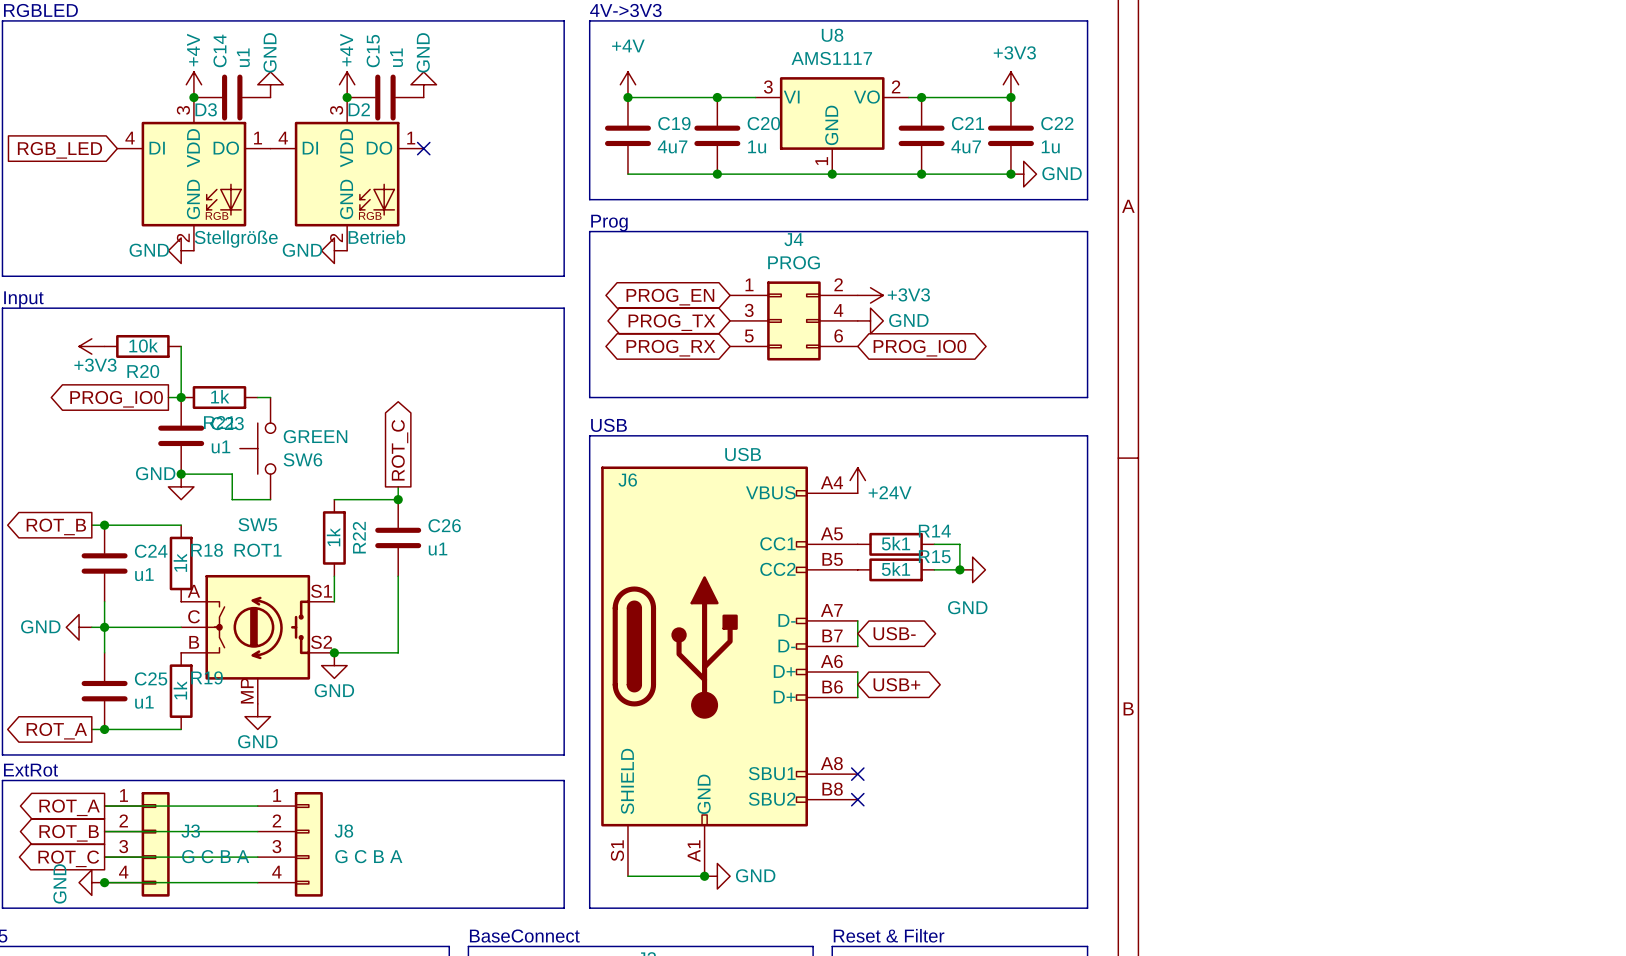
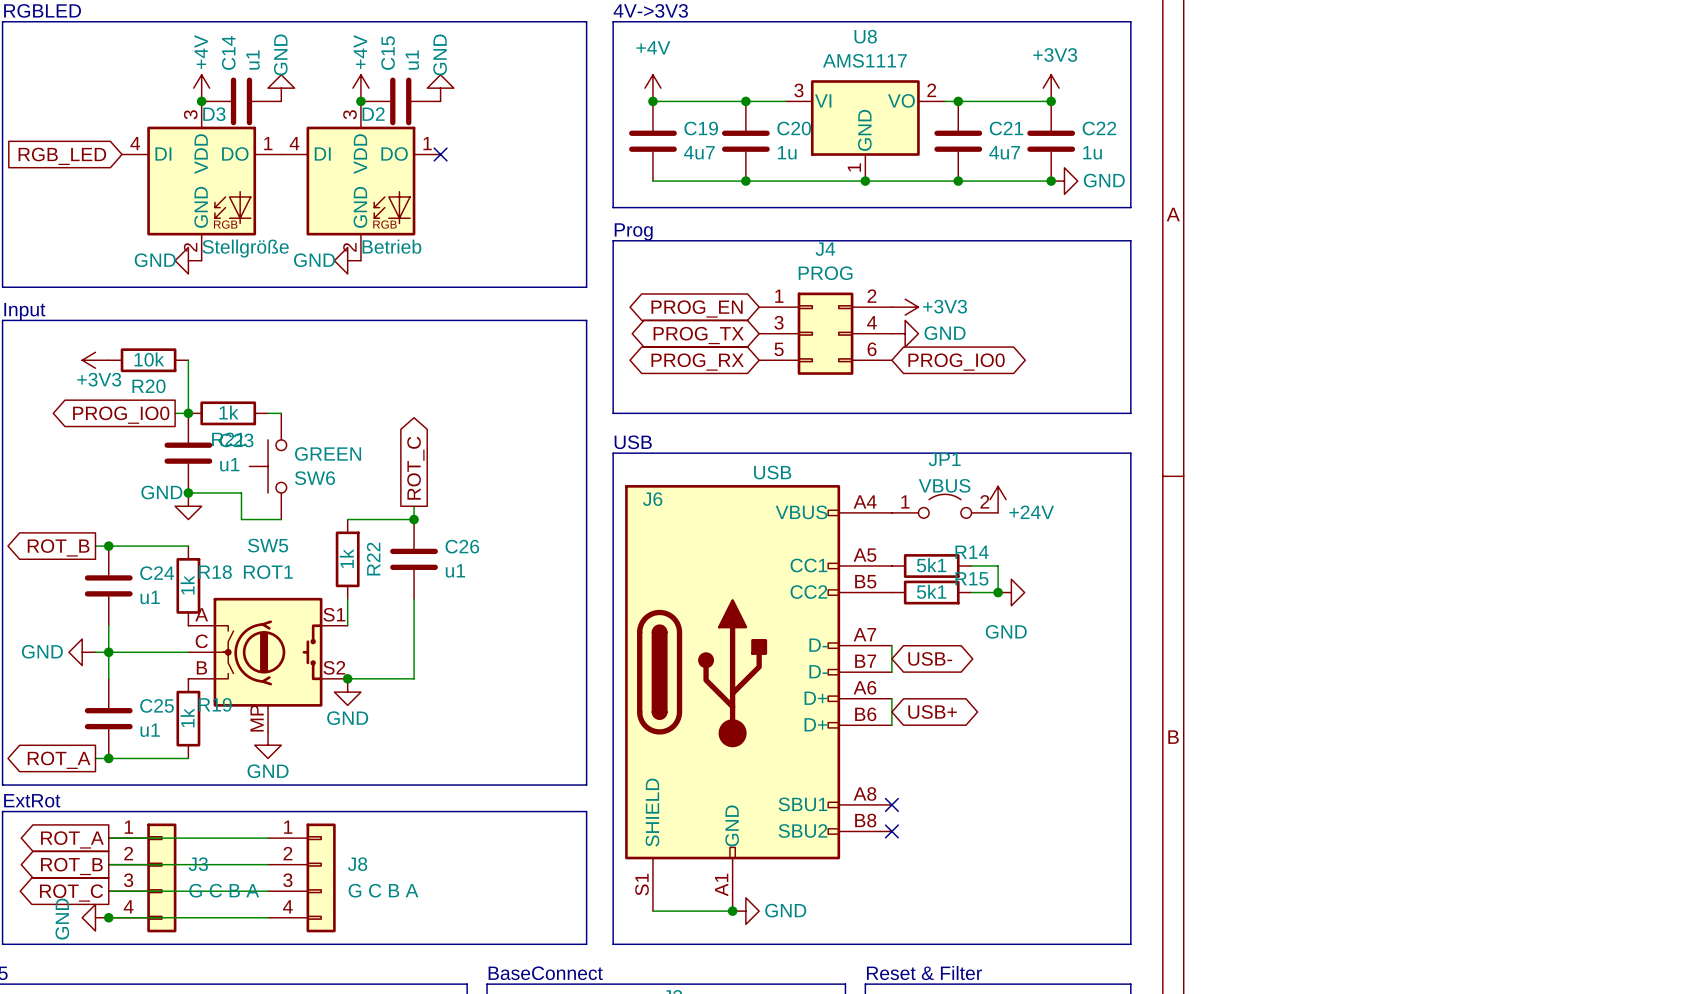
power symbol position: +24V (857, 480) -> +24V (998, 499)
JP1: none -> VBUS (944, 506)
SW5 symbol: [181, 574, 335, 704] -> [188, 597, 348, 732]

